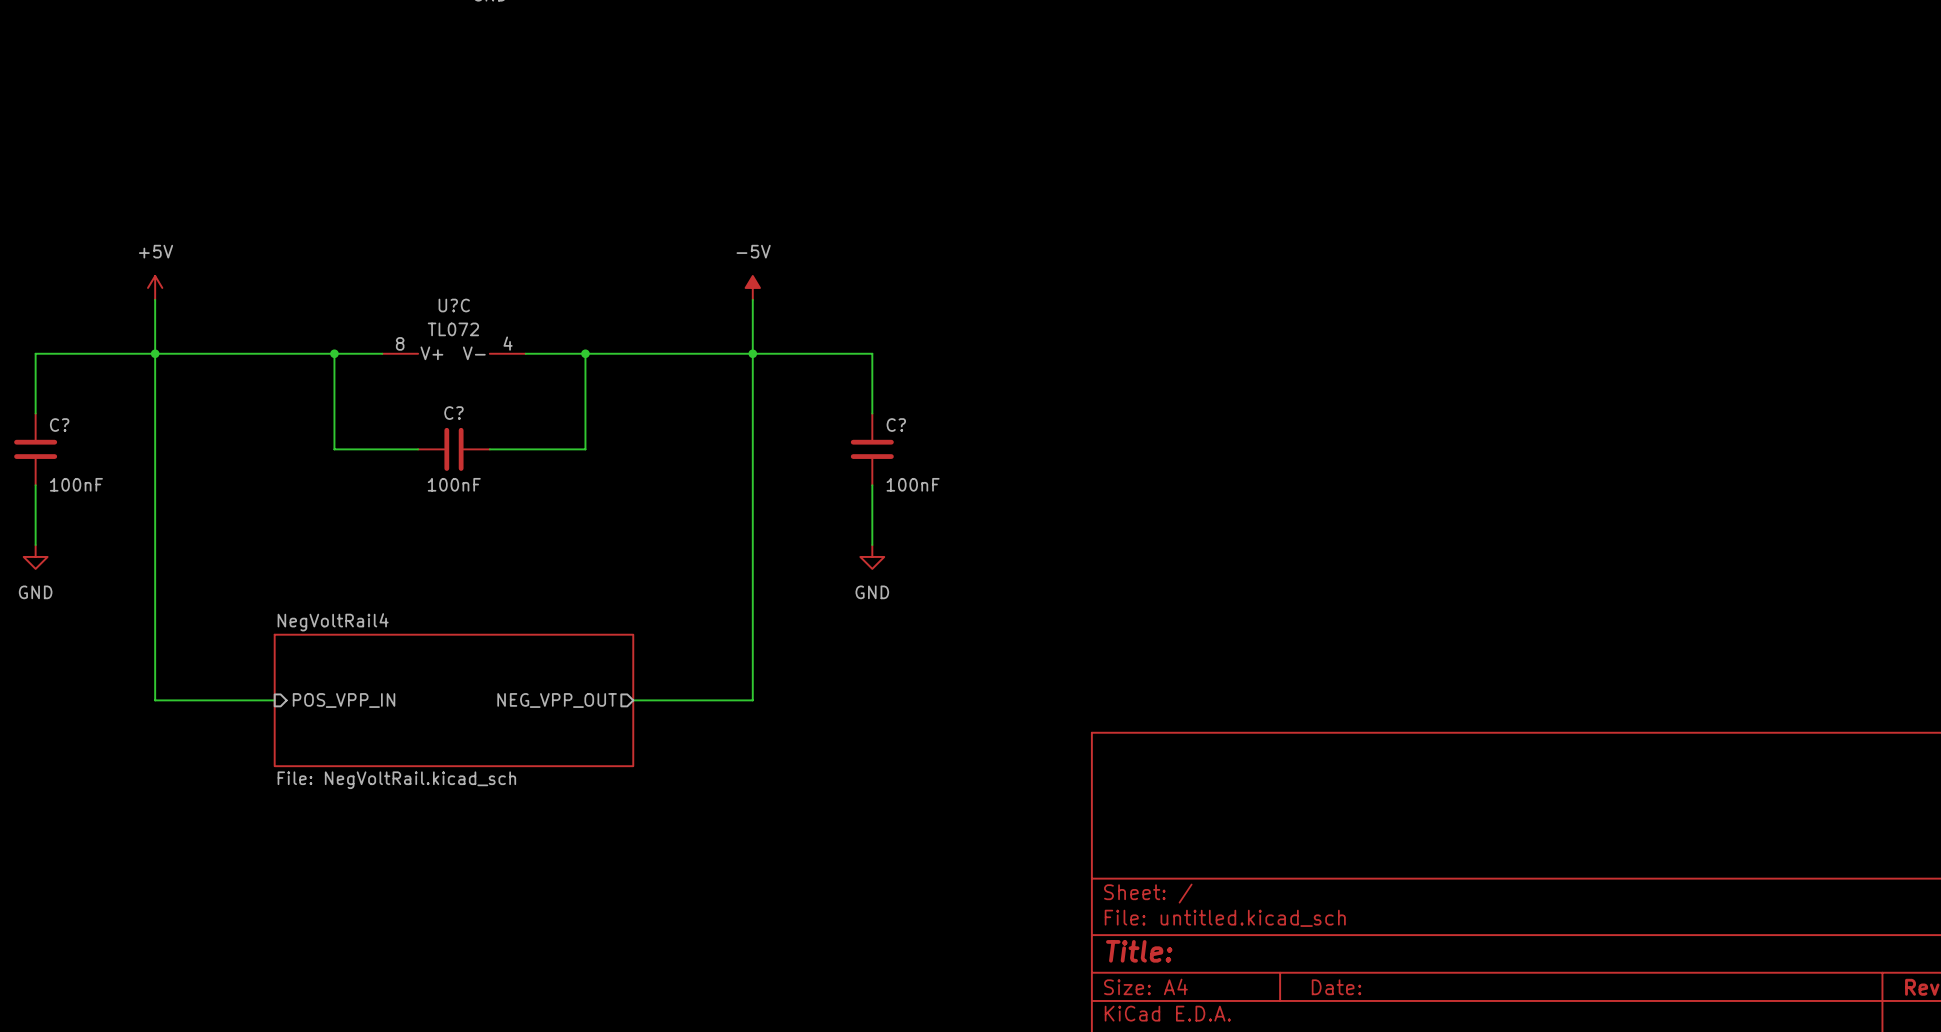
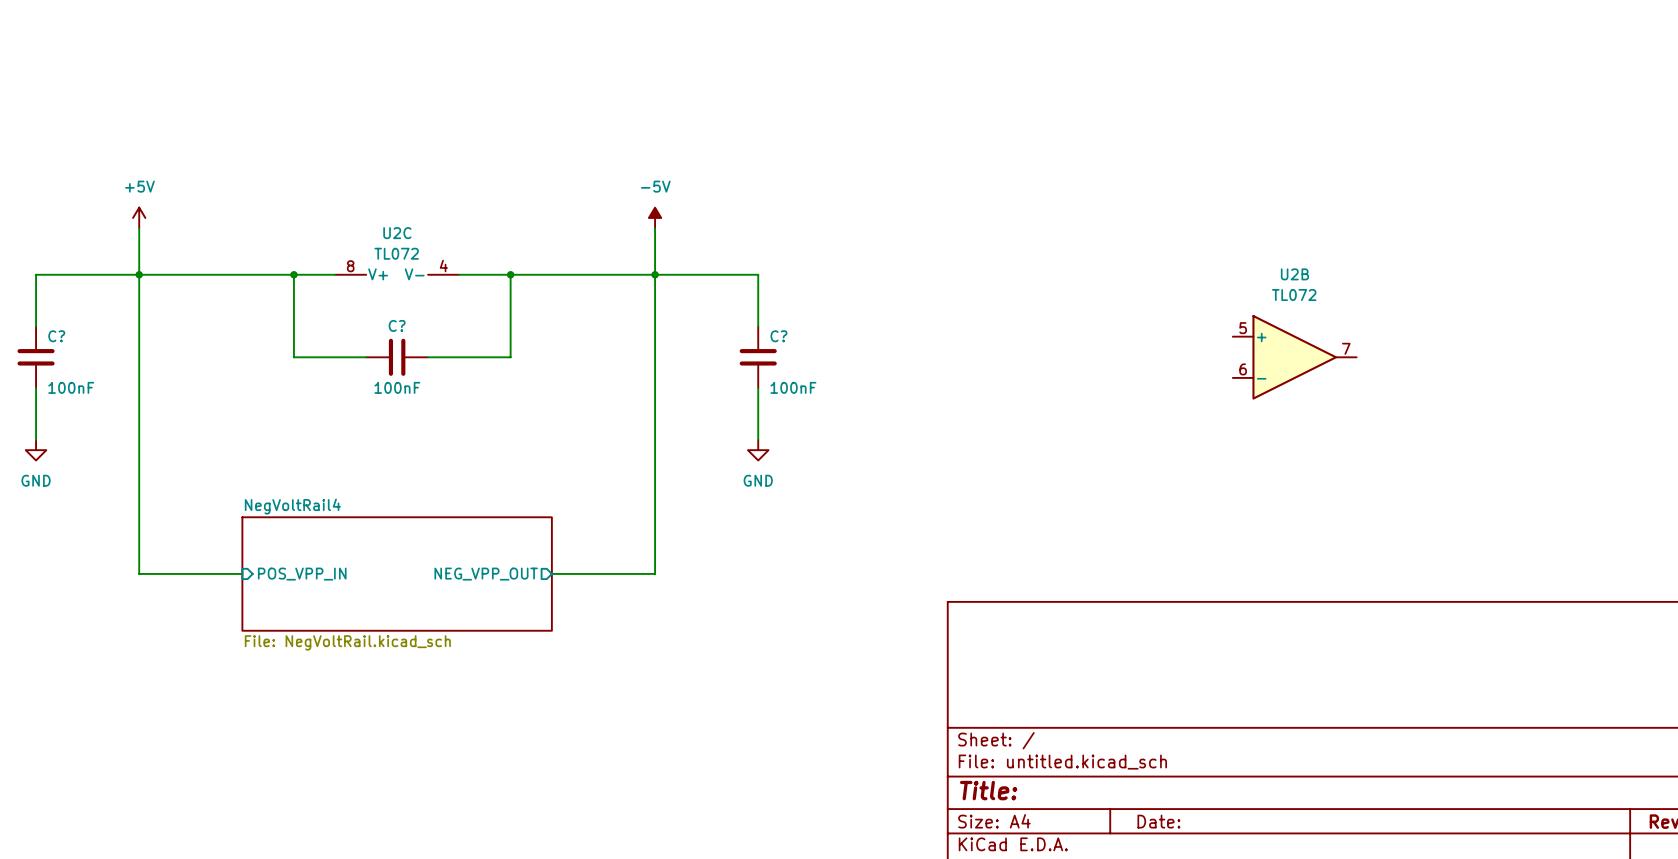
U?C name: U?C (454, 305) -> U2C (397, 233)
U2B: none -> TL072 (1294, 357)

